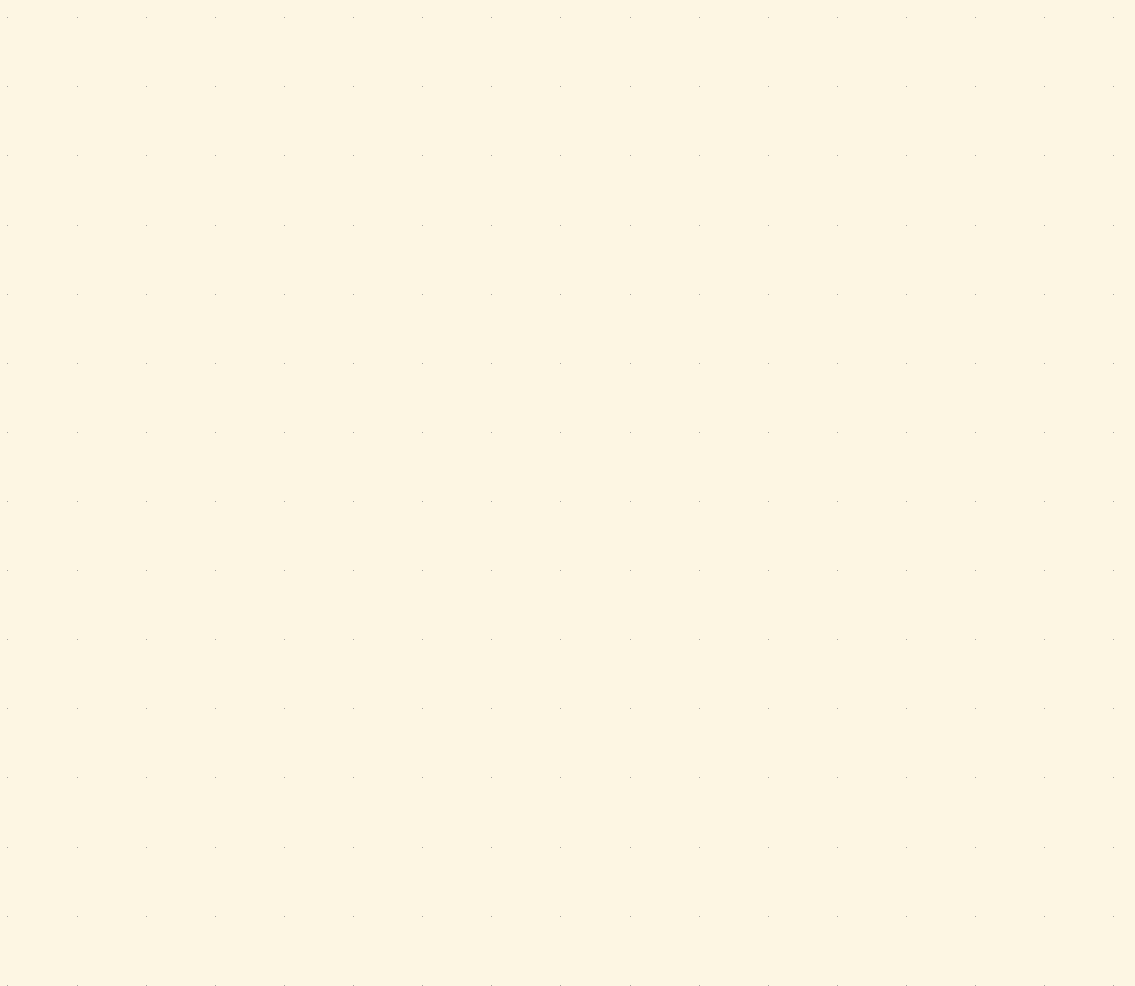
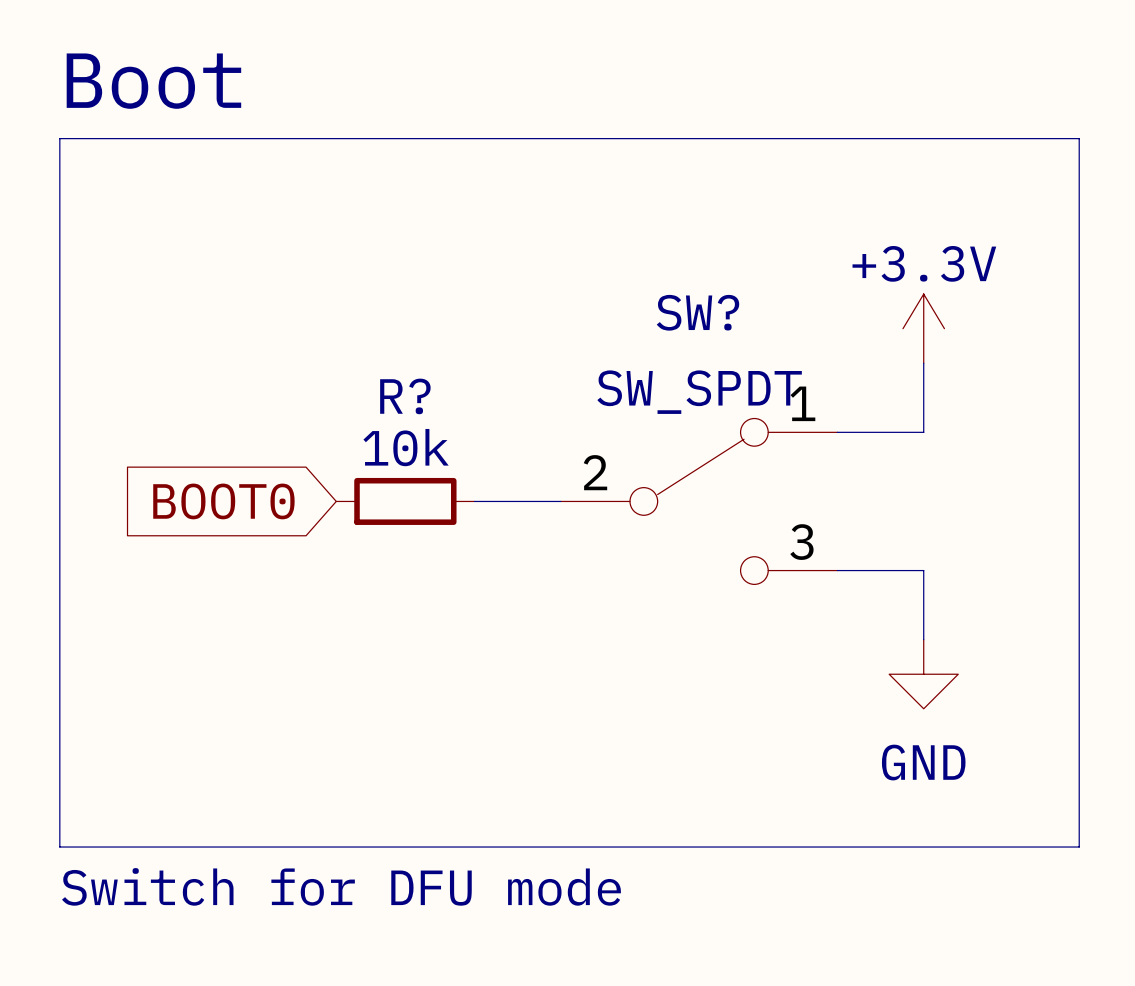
text: none -> Boot (153, 81)
line: none -> (59, 138) (1079, 138) (1079, 847) (59, 847) (59, 138)
power symbol: none -> +3.3V (923, 328)
wire: none -> (923, 363) (923, 432) (837, 432)
global label: none -> BOOT0 (223, 501)
R?: none -> 10k (405, 501)
wire: none -> (474, 501) (560, 501)
SW?: none -> SW_SPDT (699, 501)
wire: none -> (837, 570) (923, 570) (923, 639)
power symbol: none -> GND (923, 674)
text: none -> Switch for DFU mode (341, 886)

